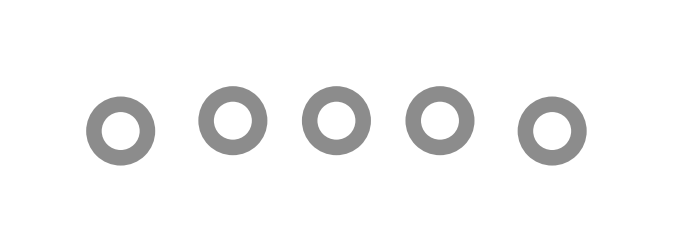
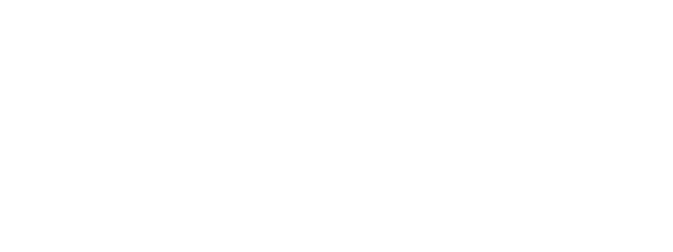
part: (336, 125) -> none

